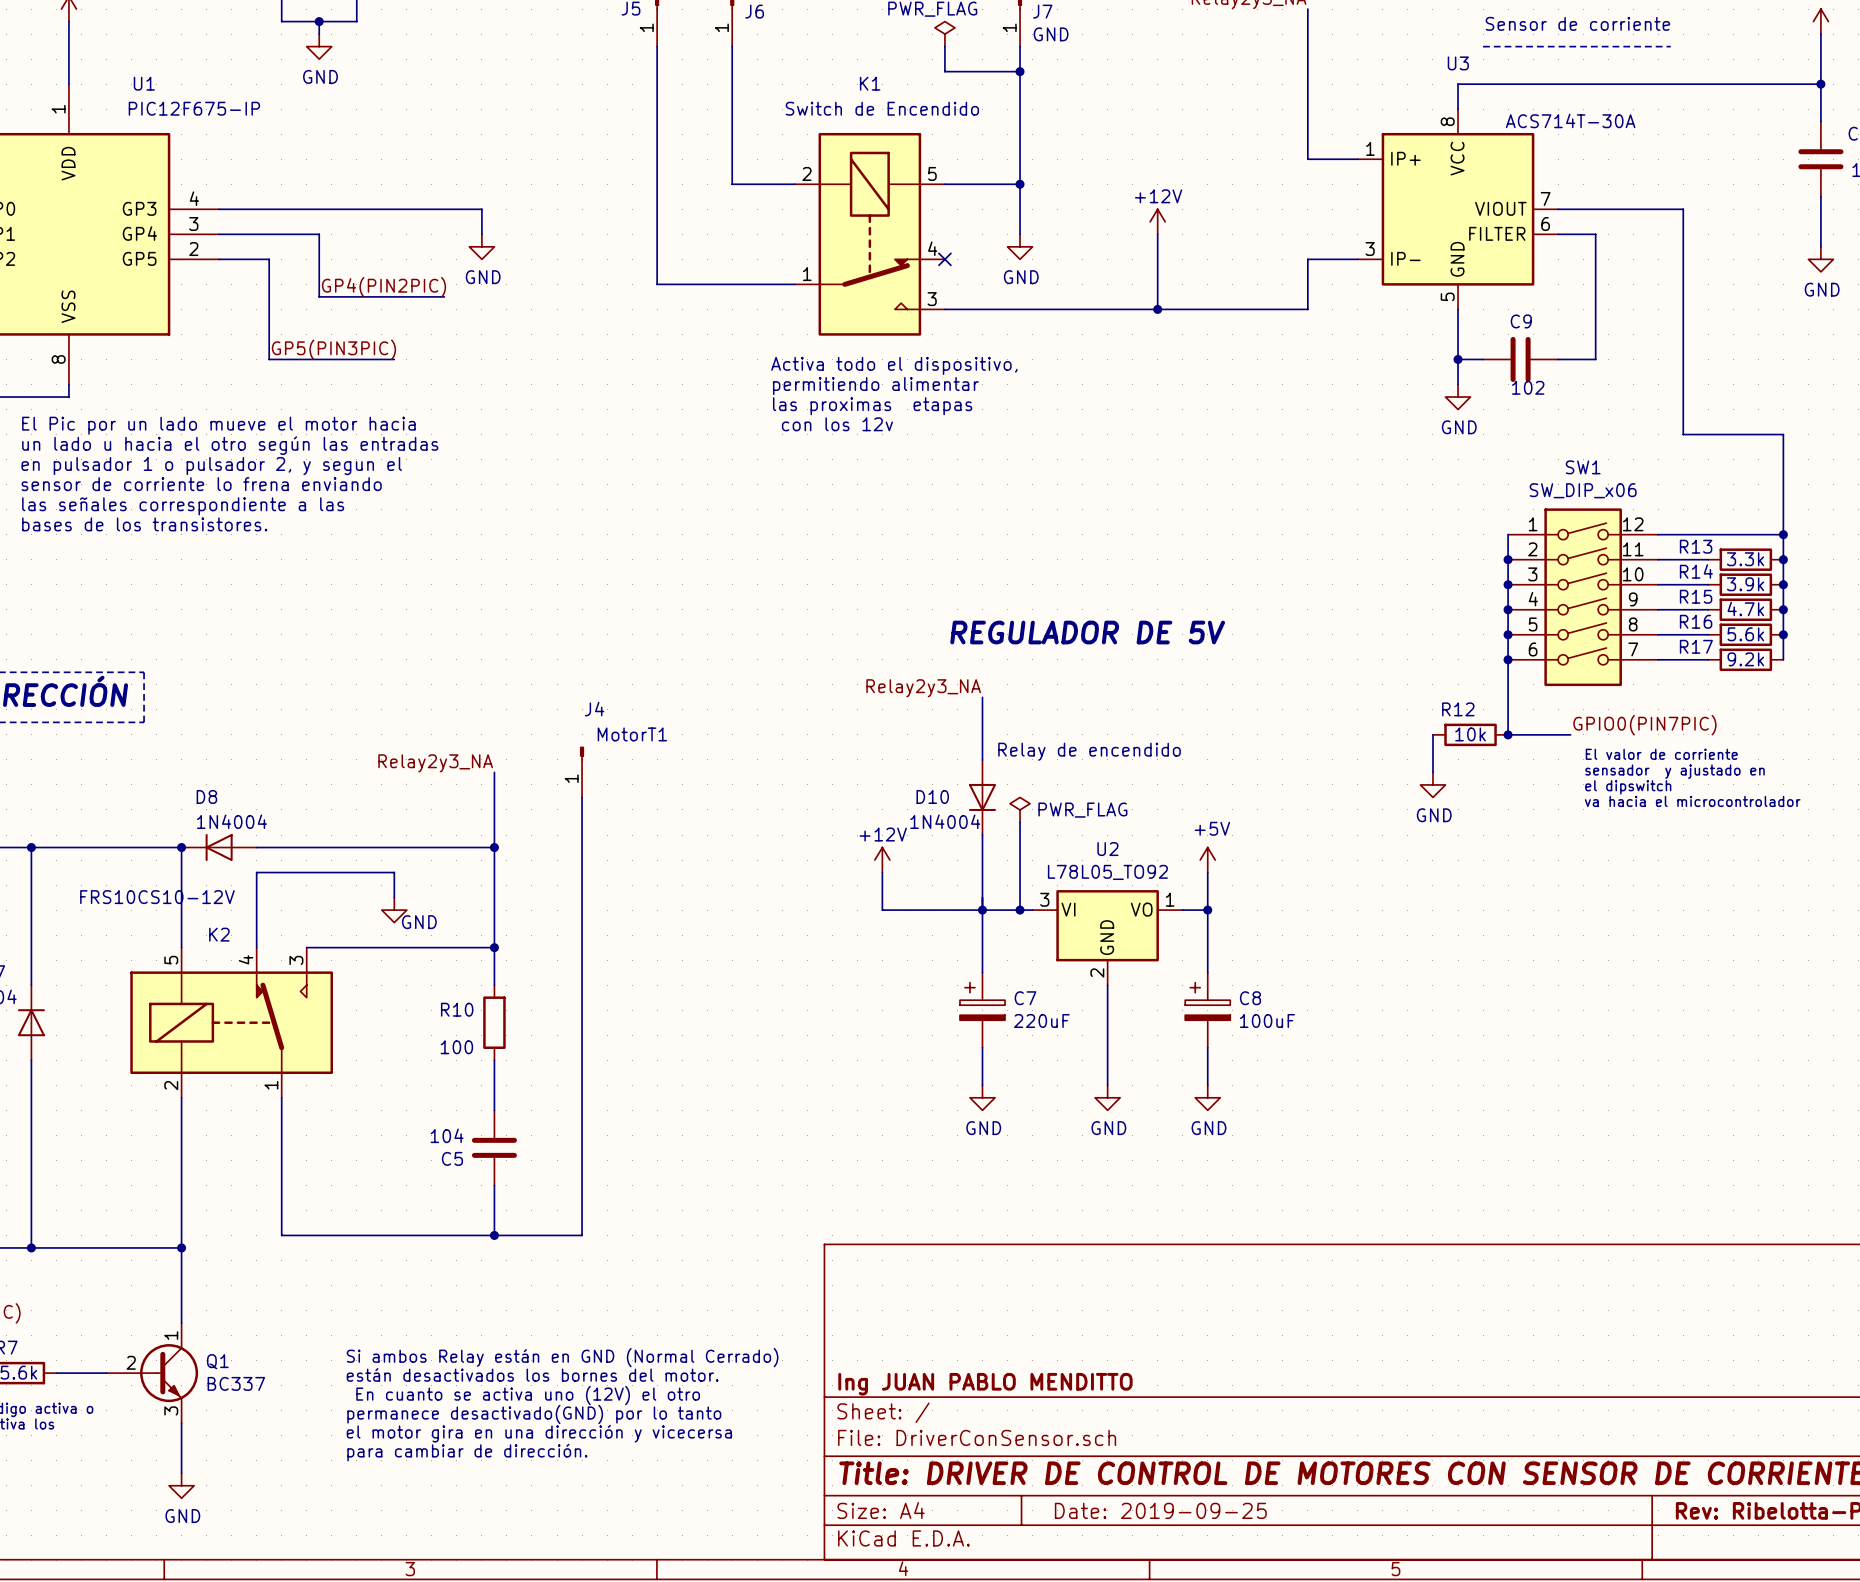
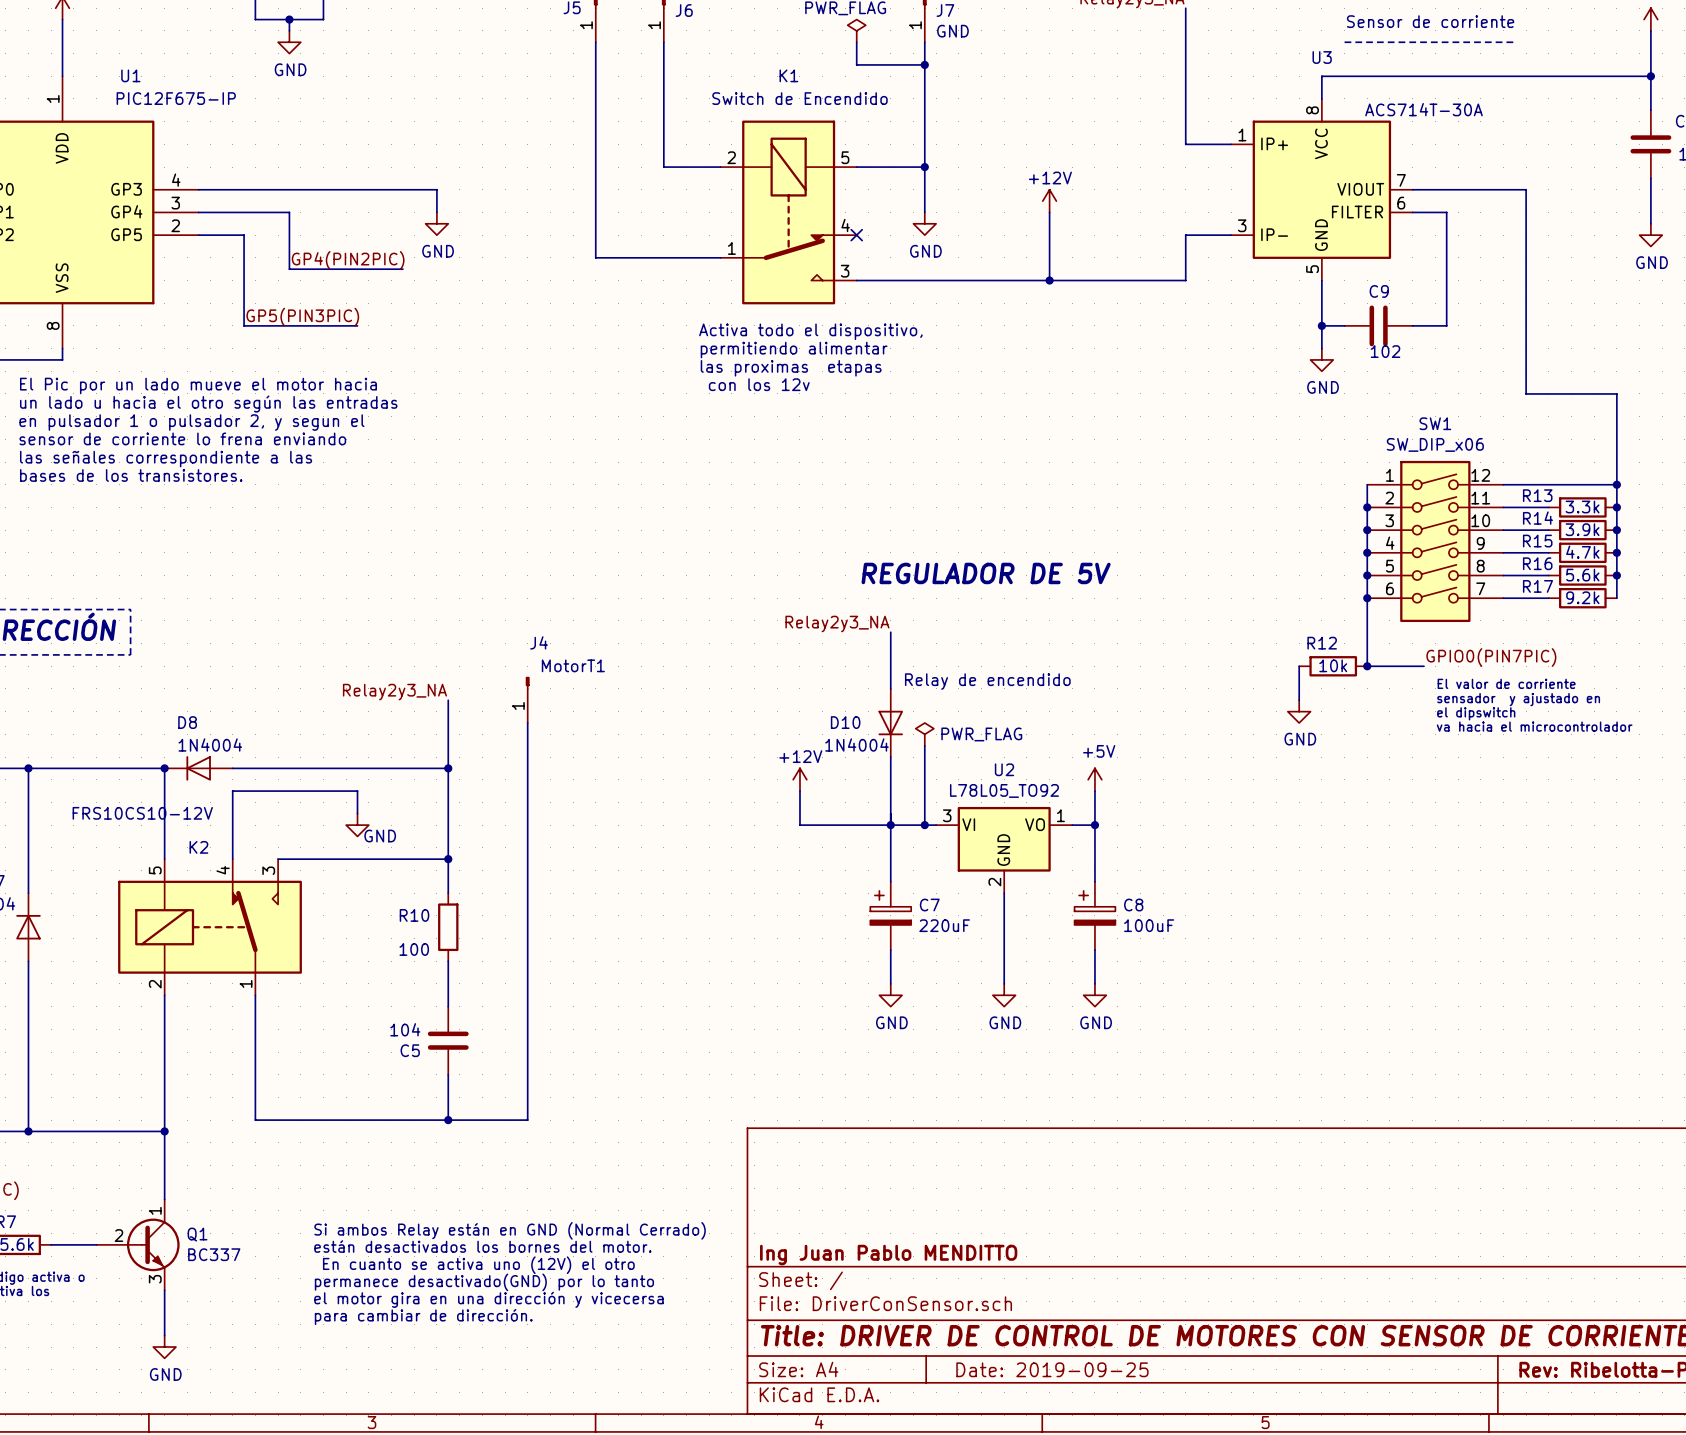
title block: Ing JUAN PABLO MENDITTO (985, 1384) -> Ing Juan Pablo MENDITTO (888, 1255)

